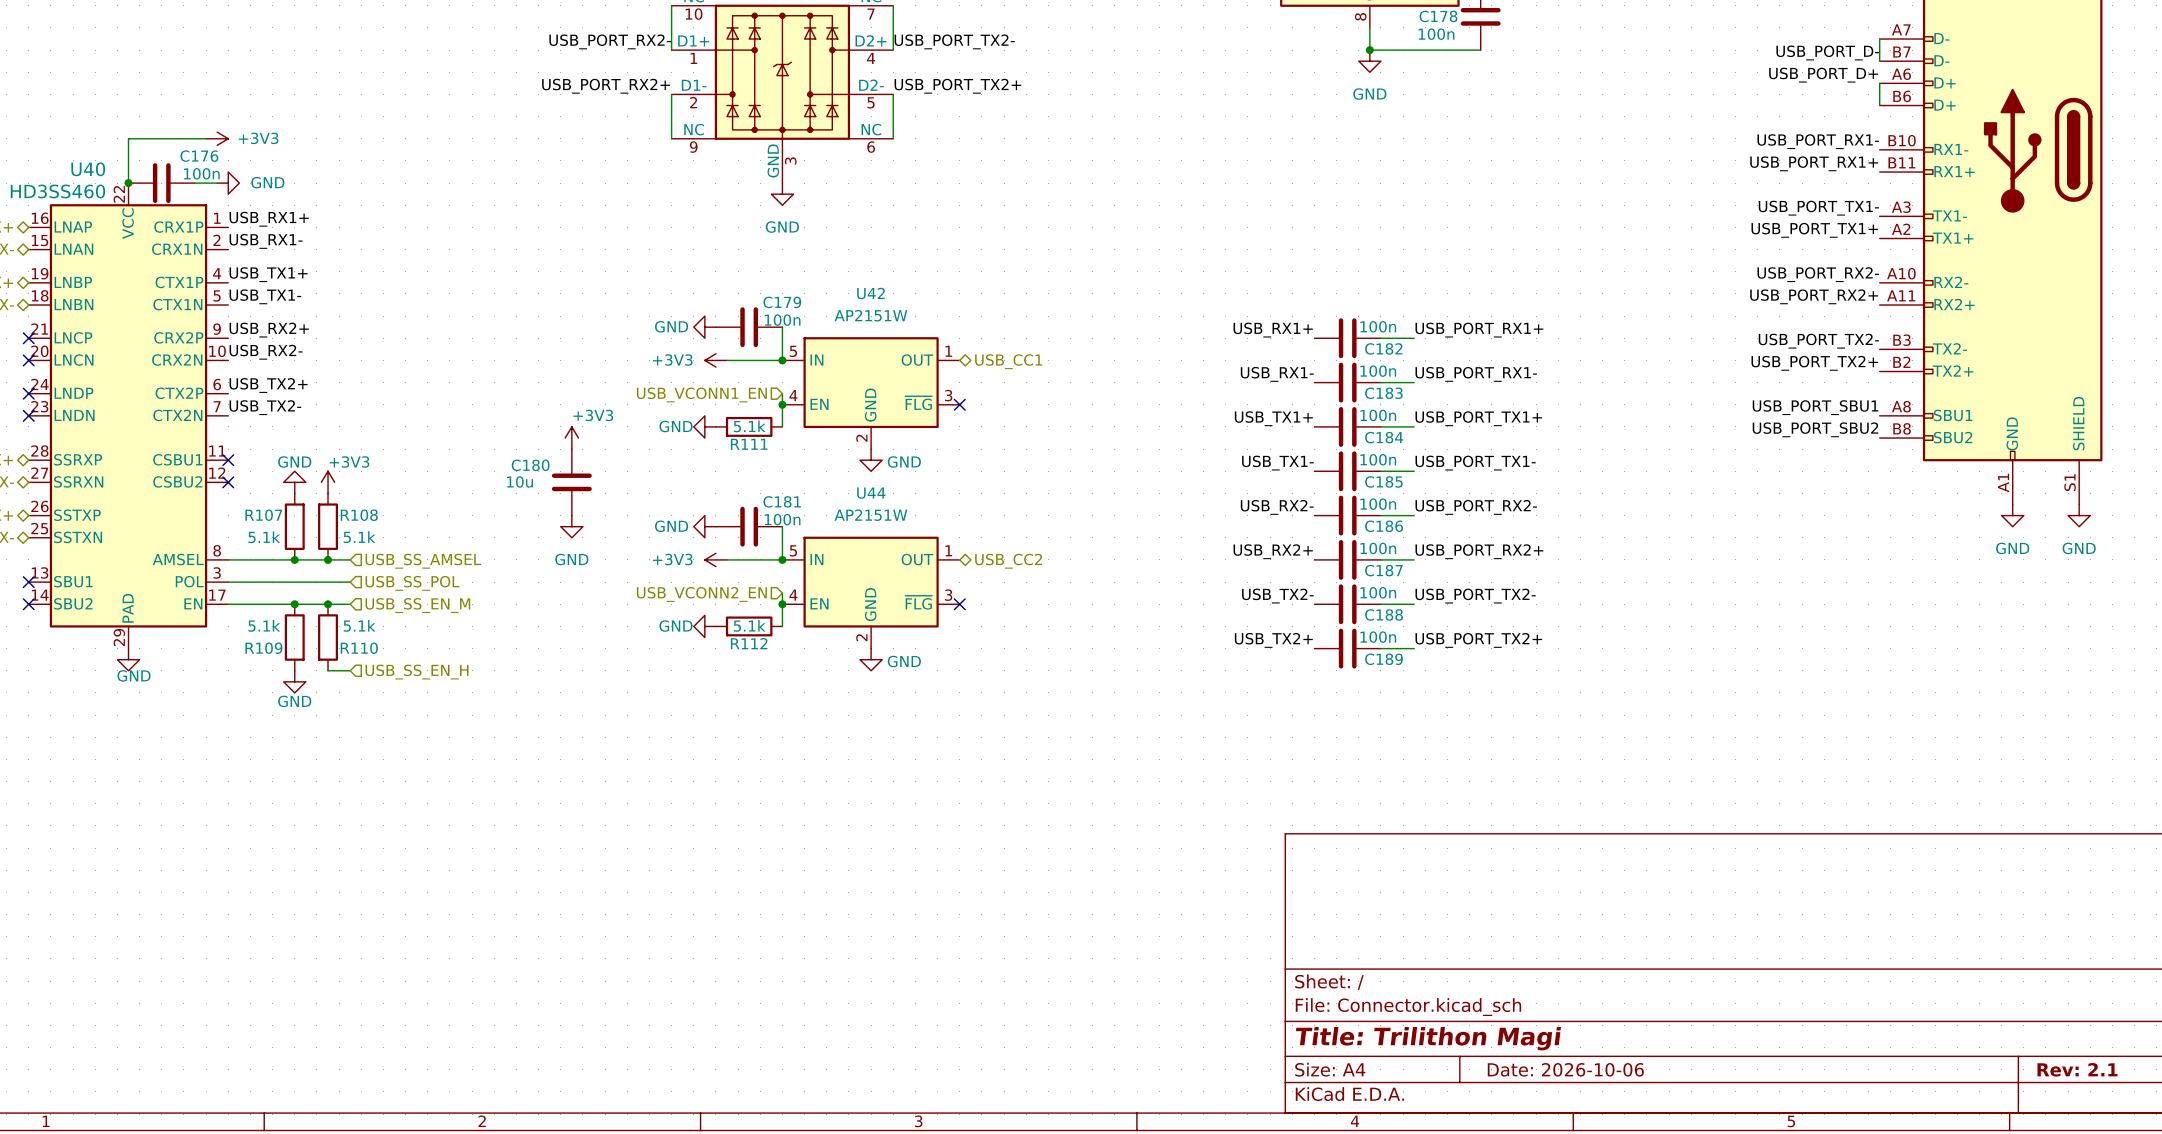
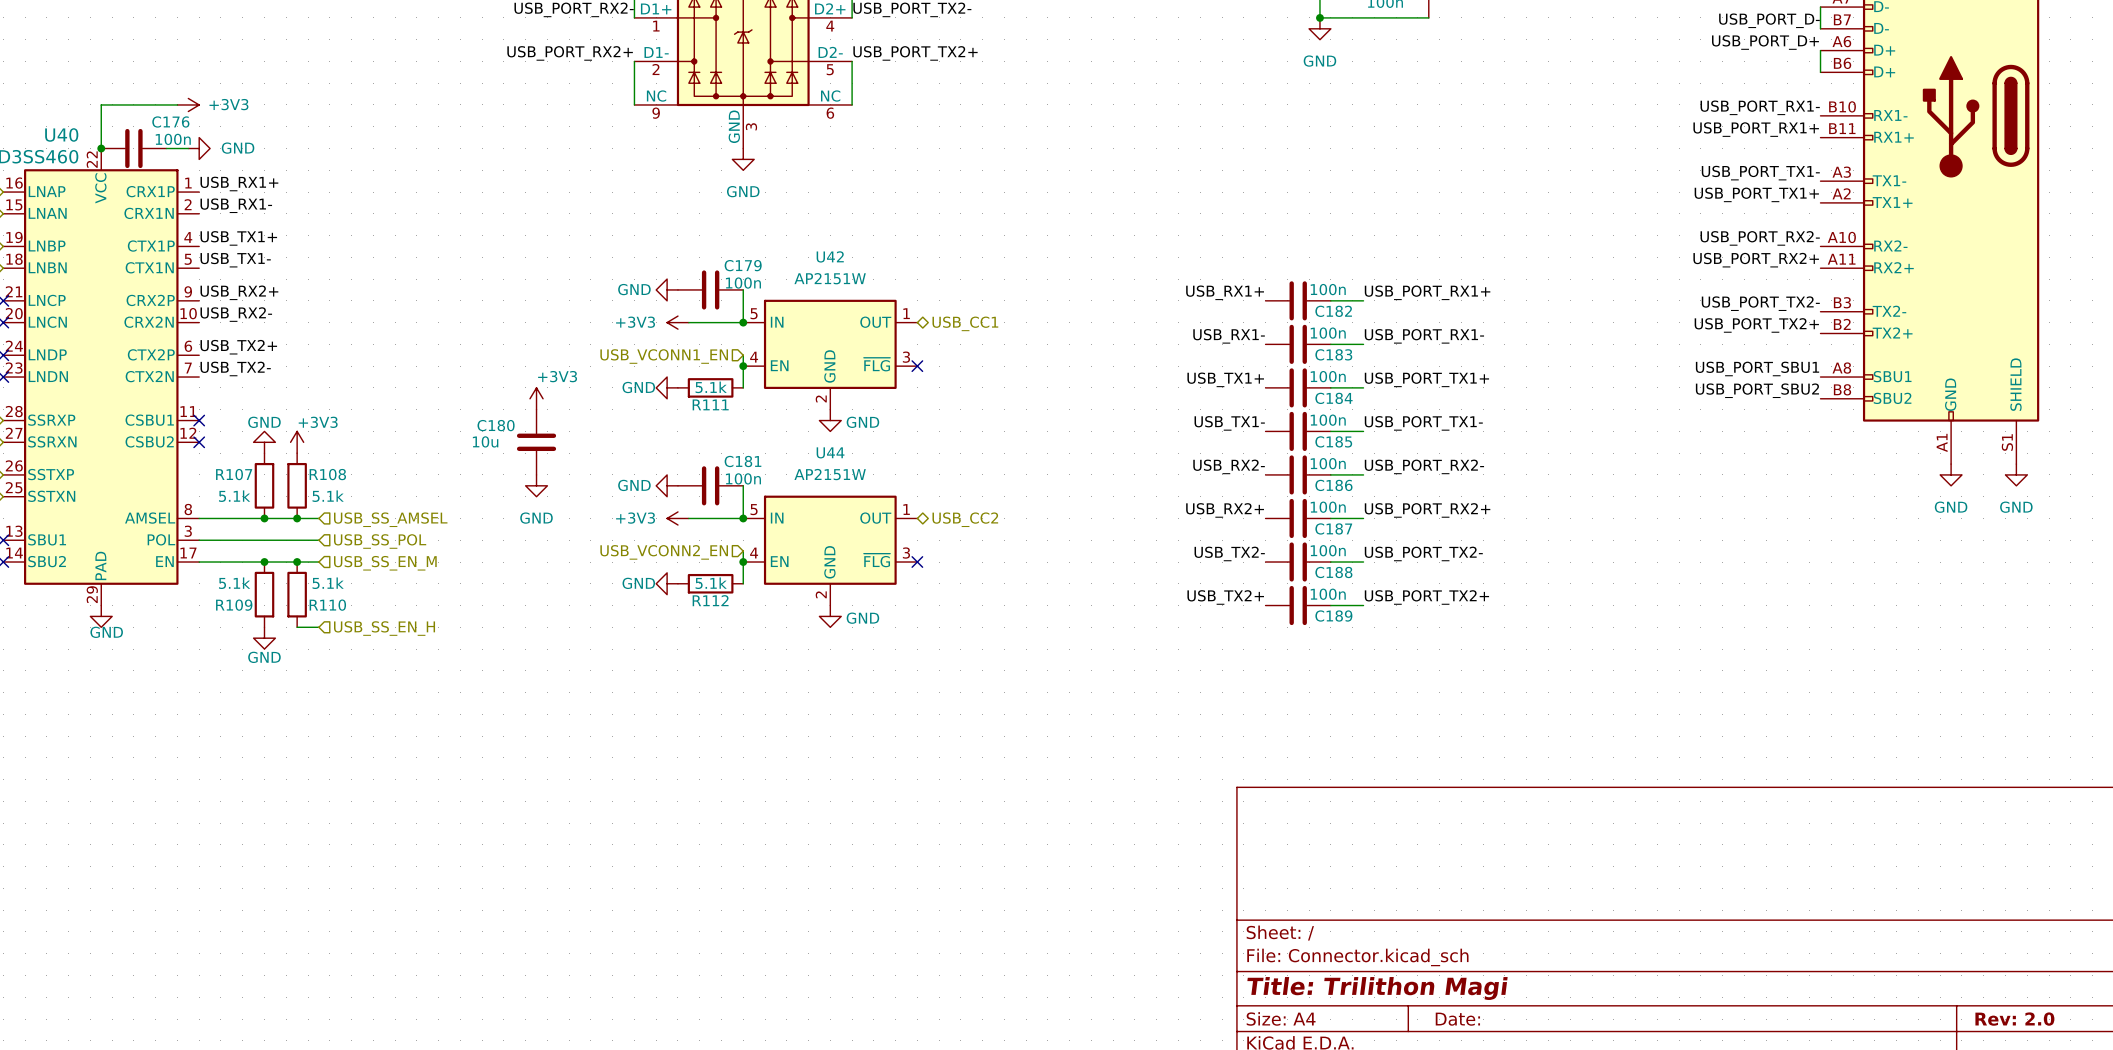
title block: Date: 2026-10-06 (1565, 1069) -> Date: (1457, 1019)
title block: Rev: 2.1 (2077, 1069) -> Rev: 2.0 (2014, 1019)

